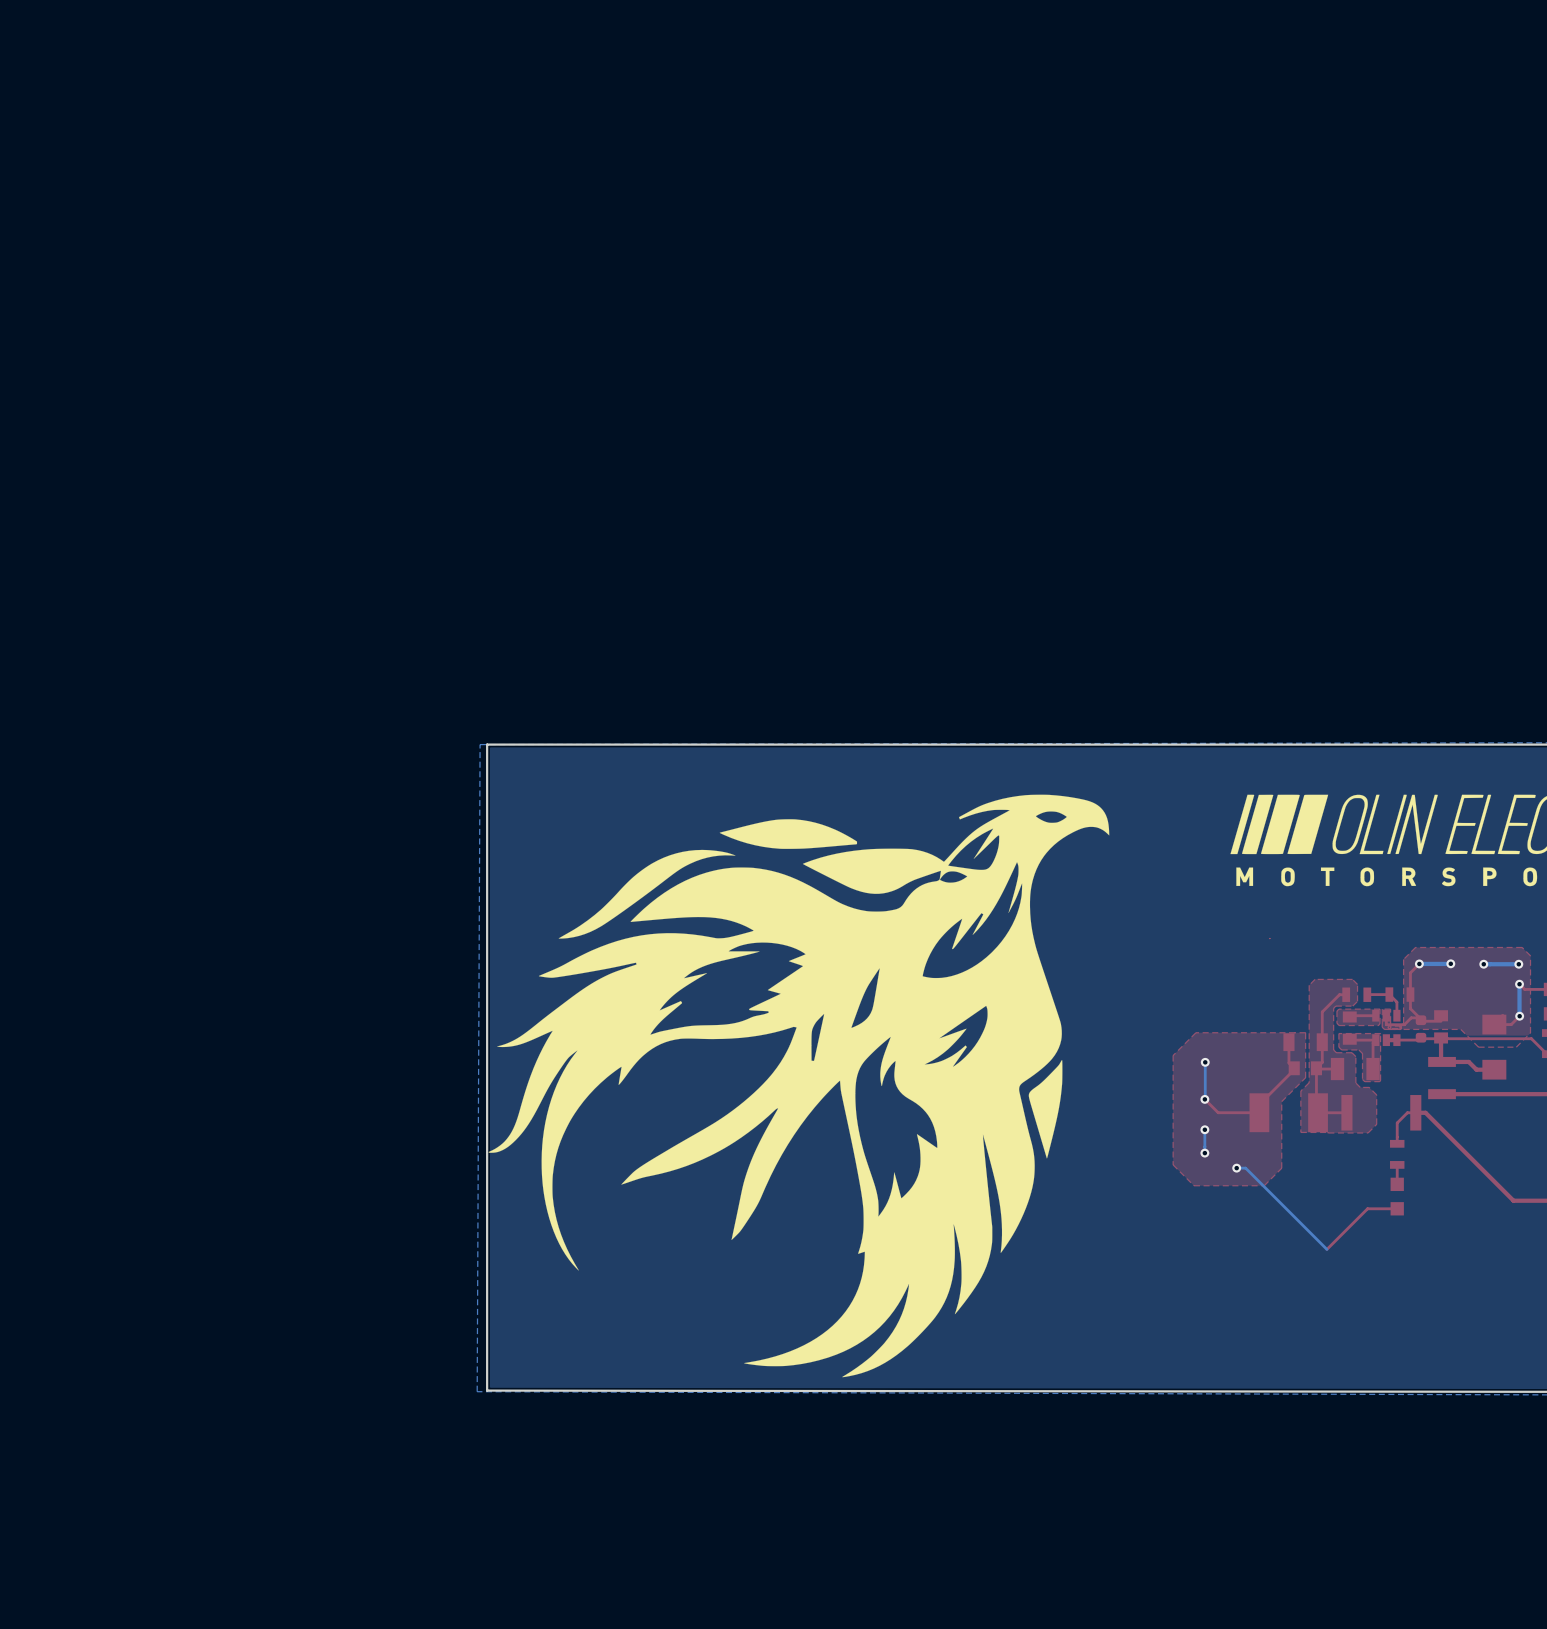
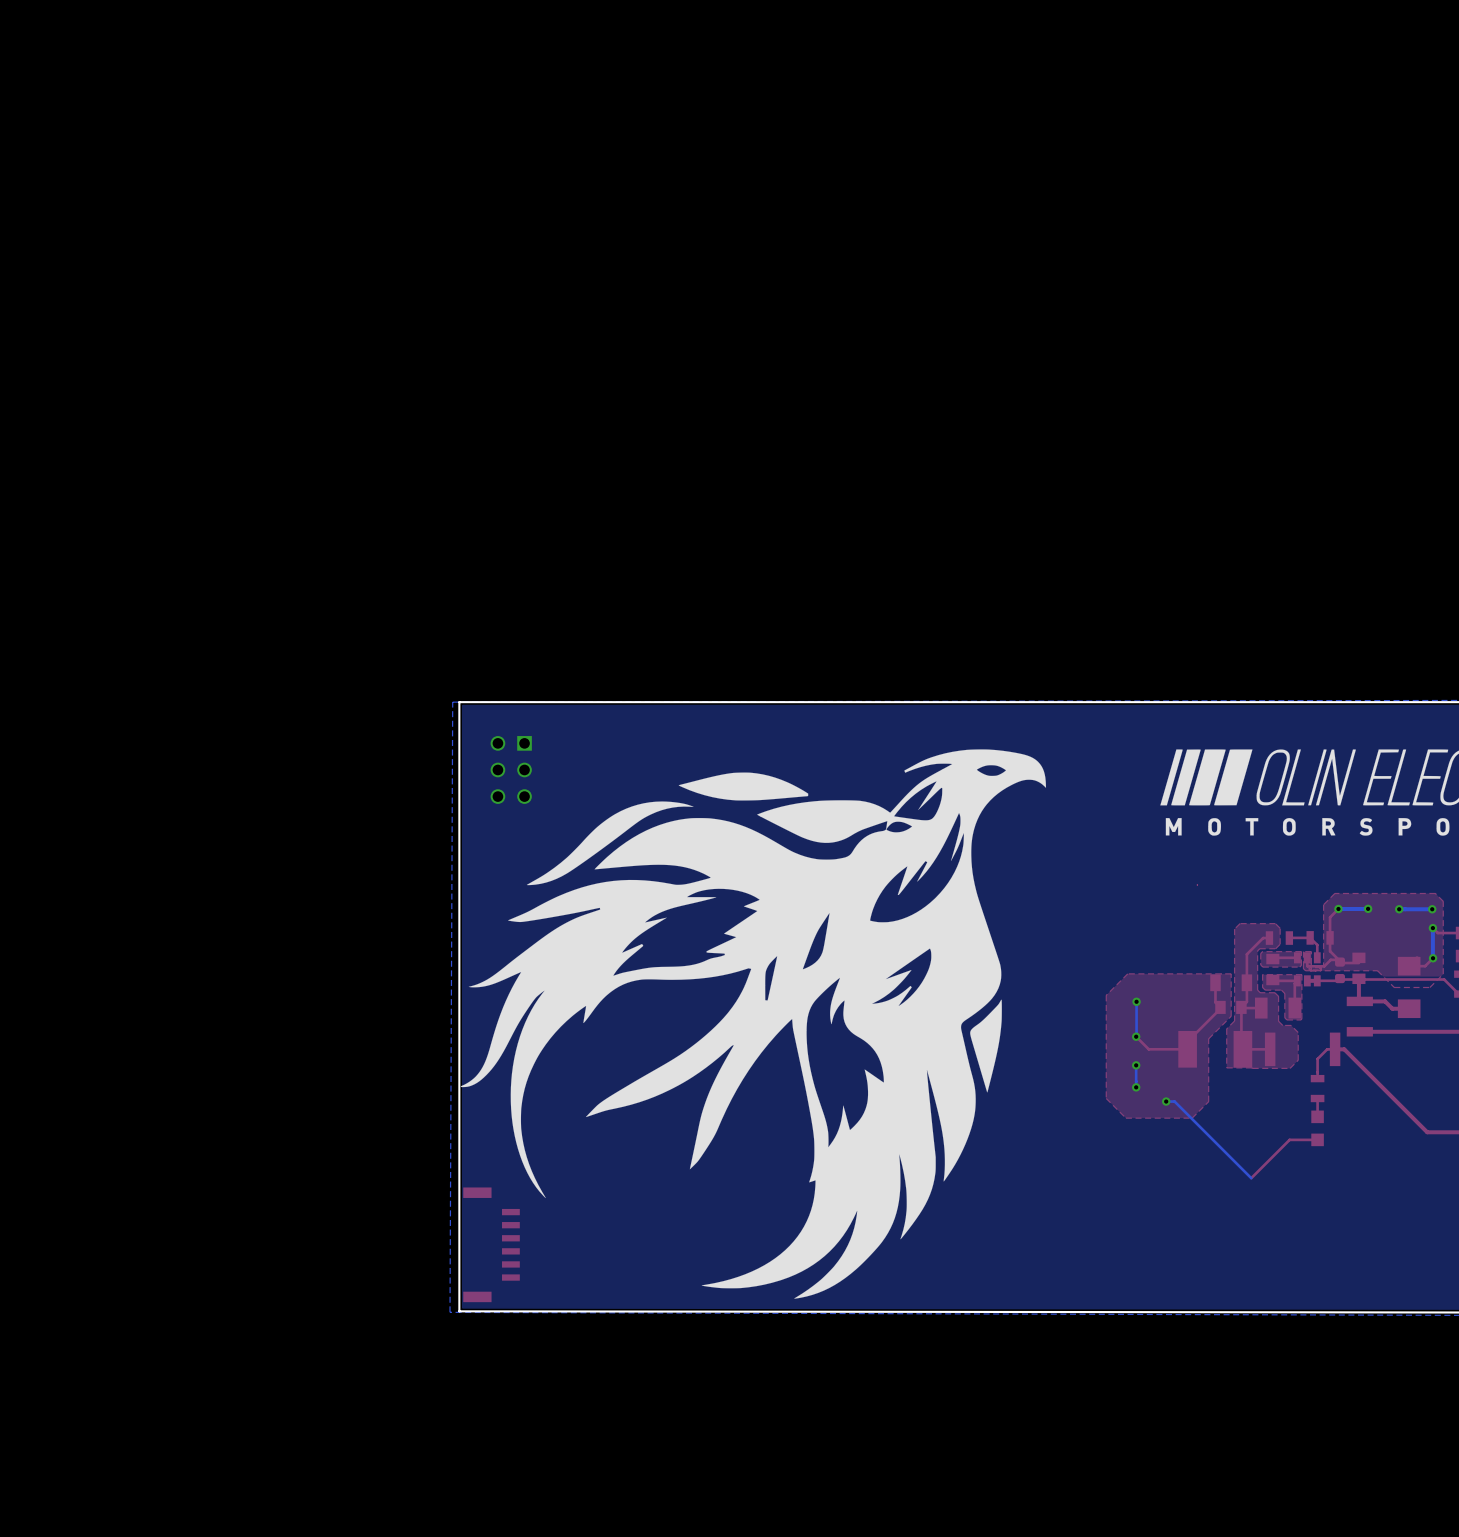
part: none -> (511, 769)
part: none -> (491, 1244)

